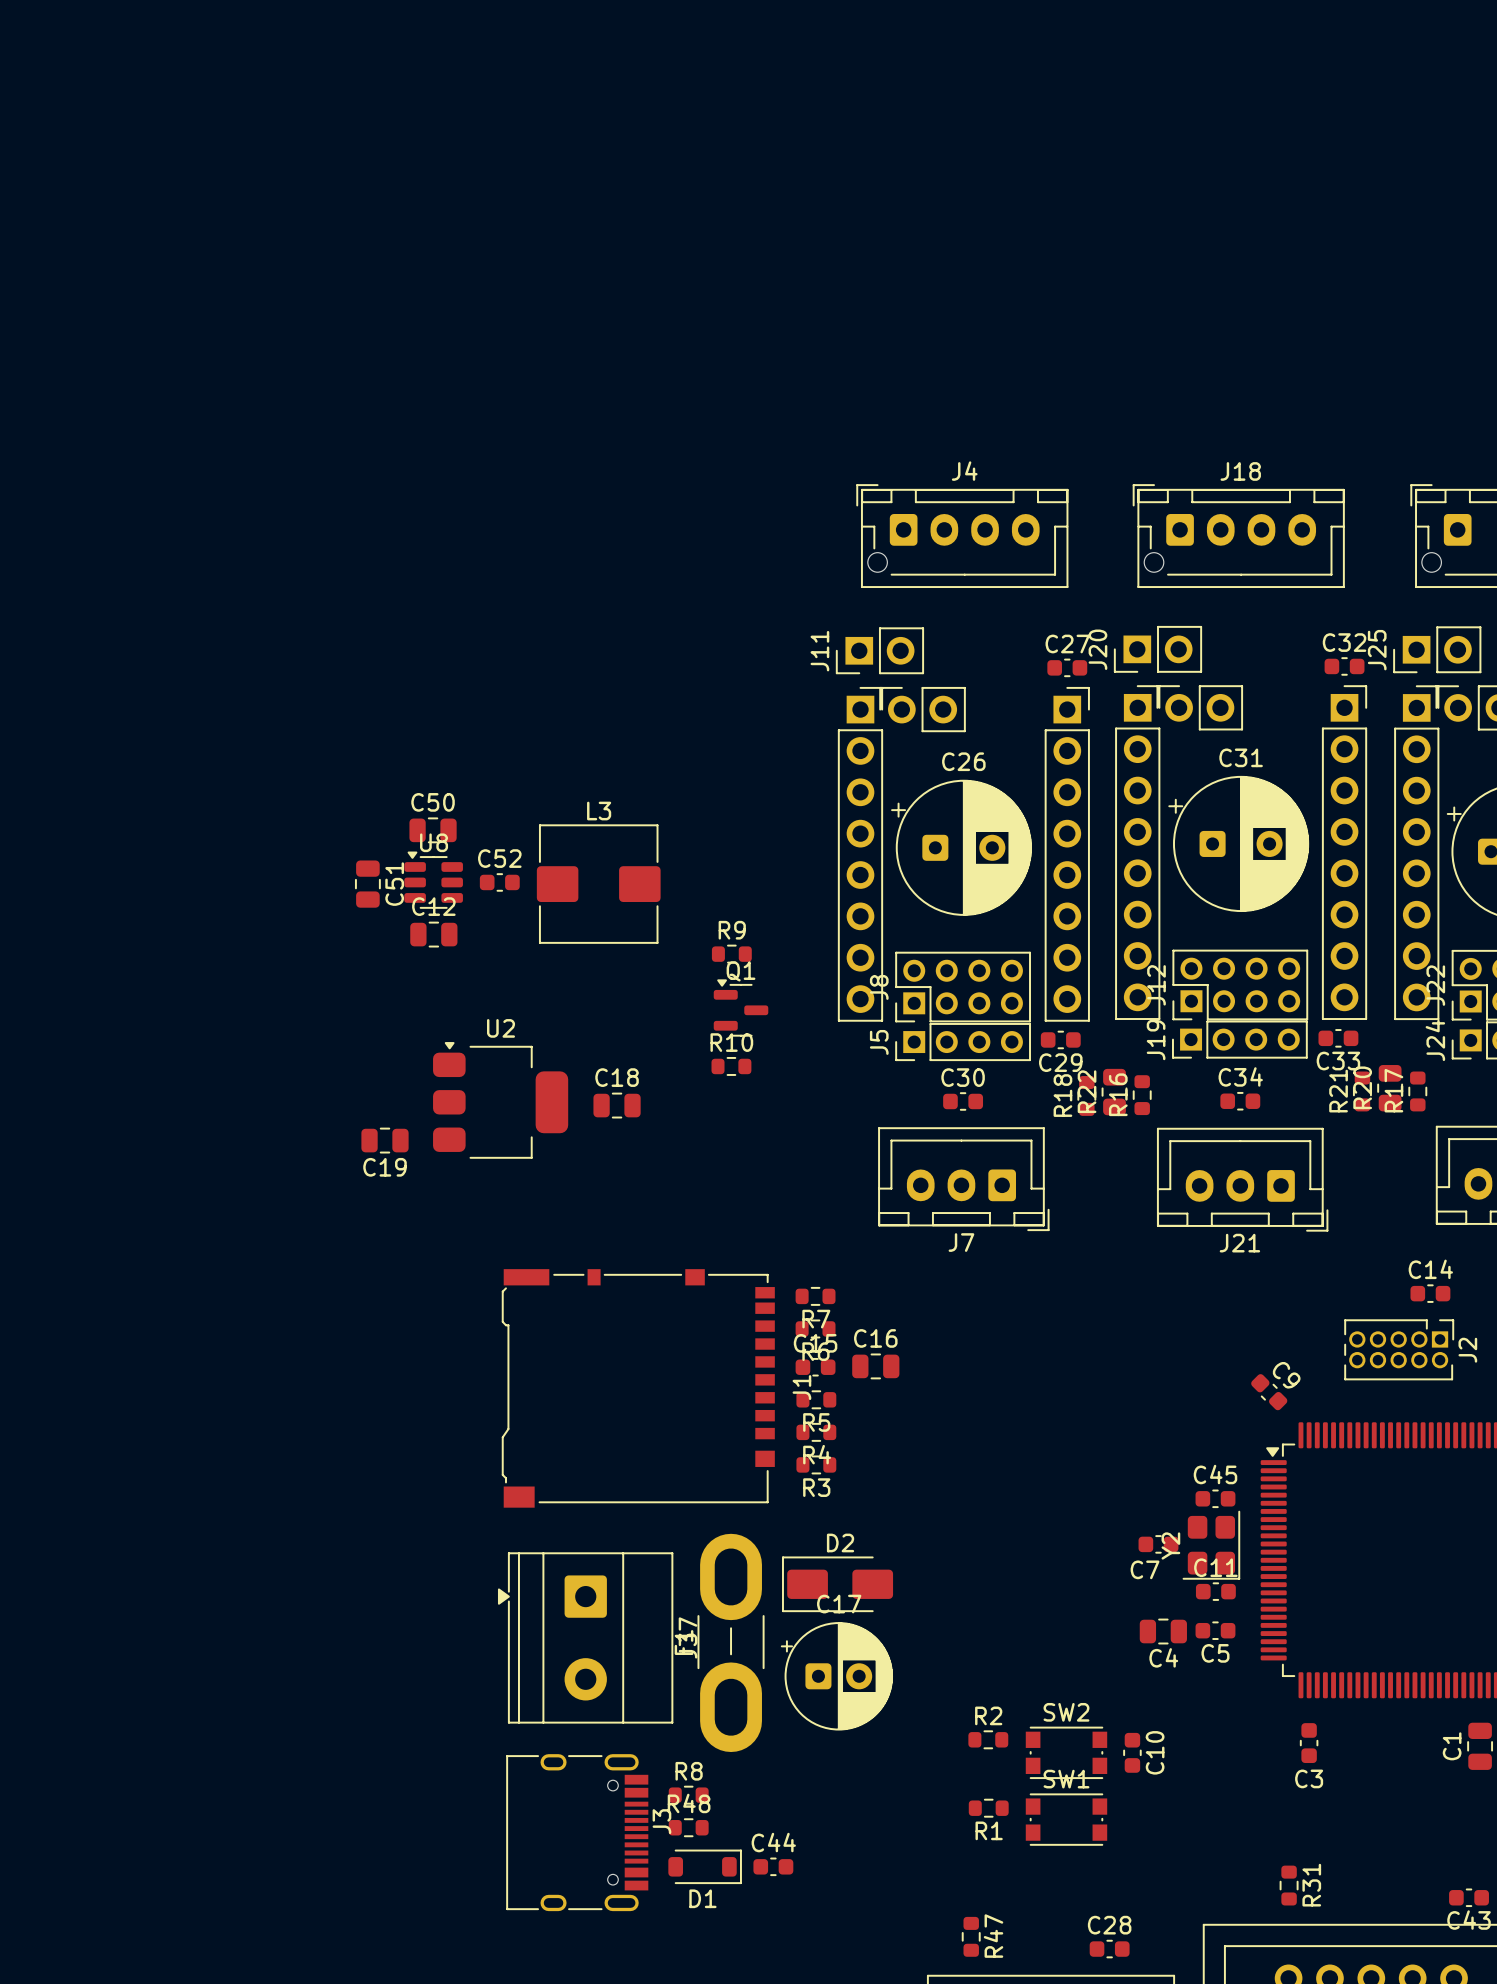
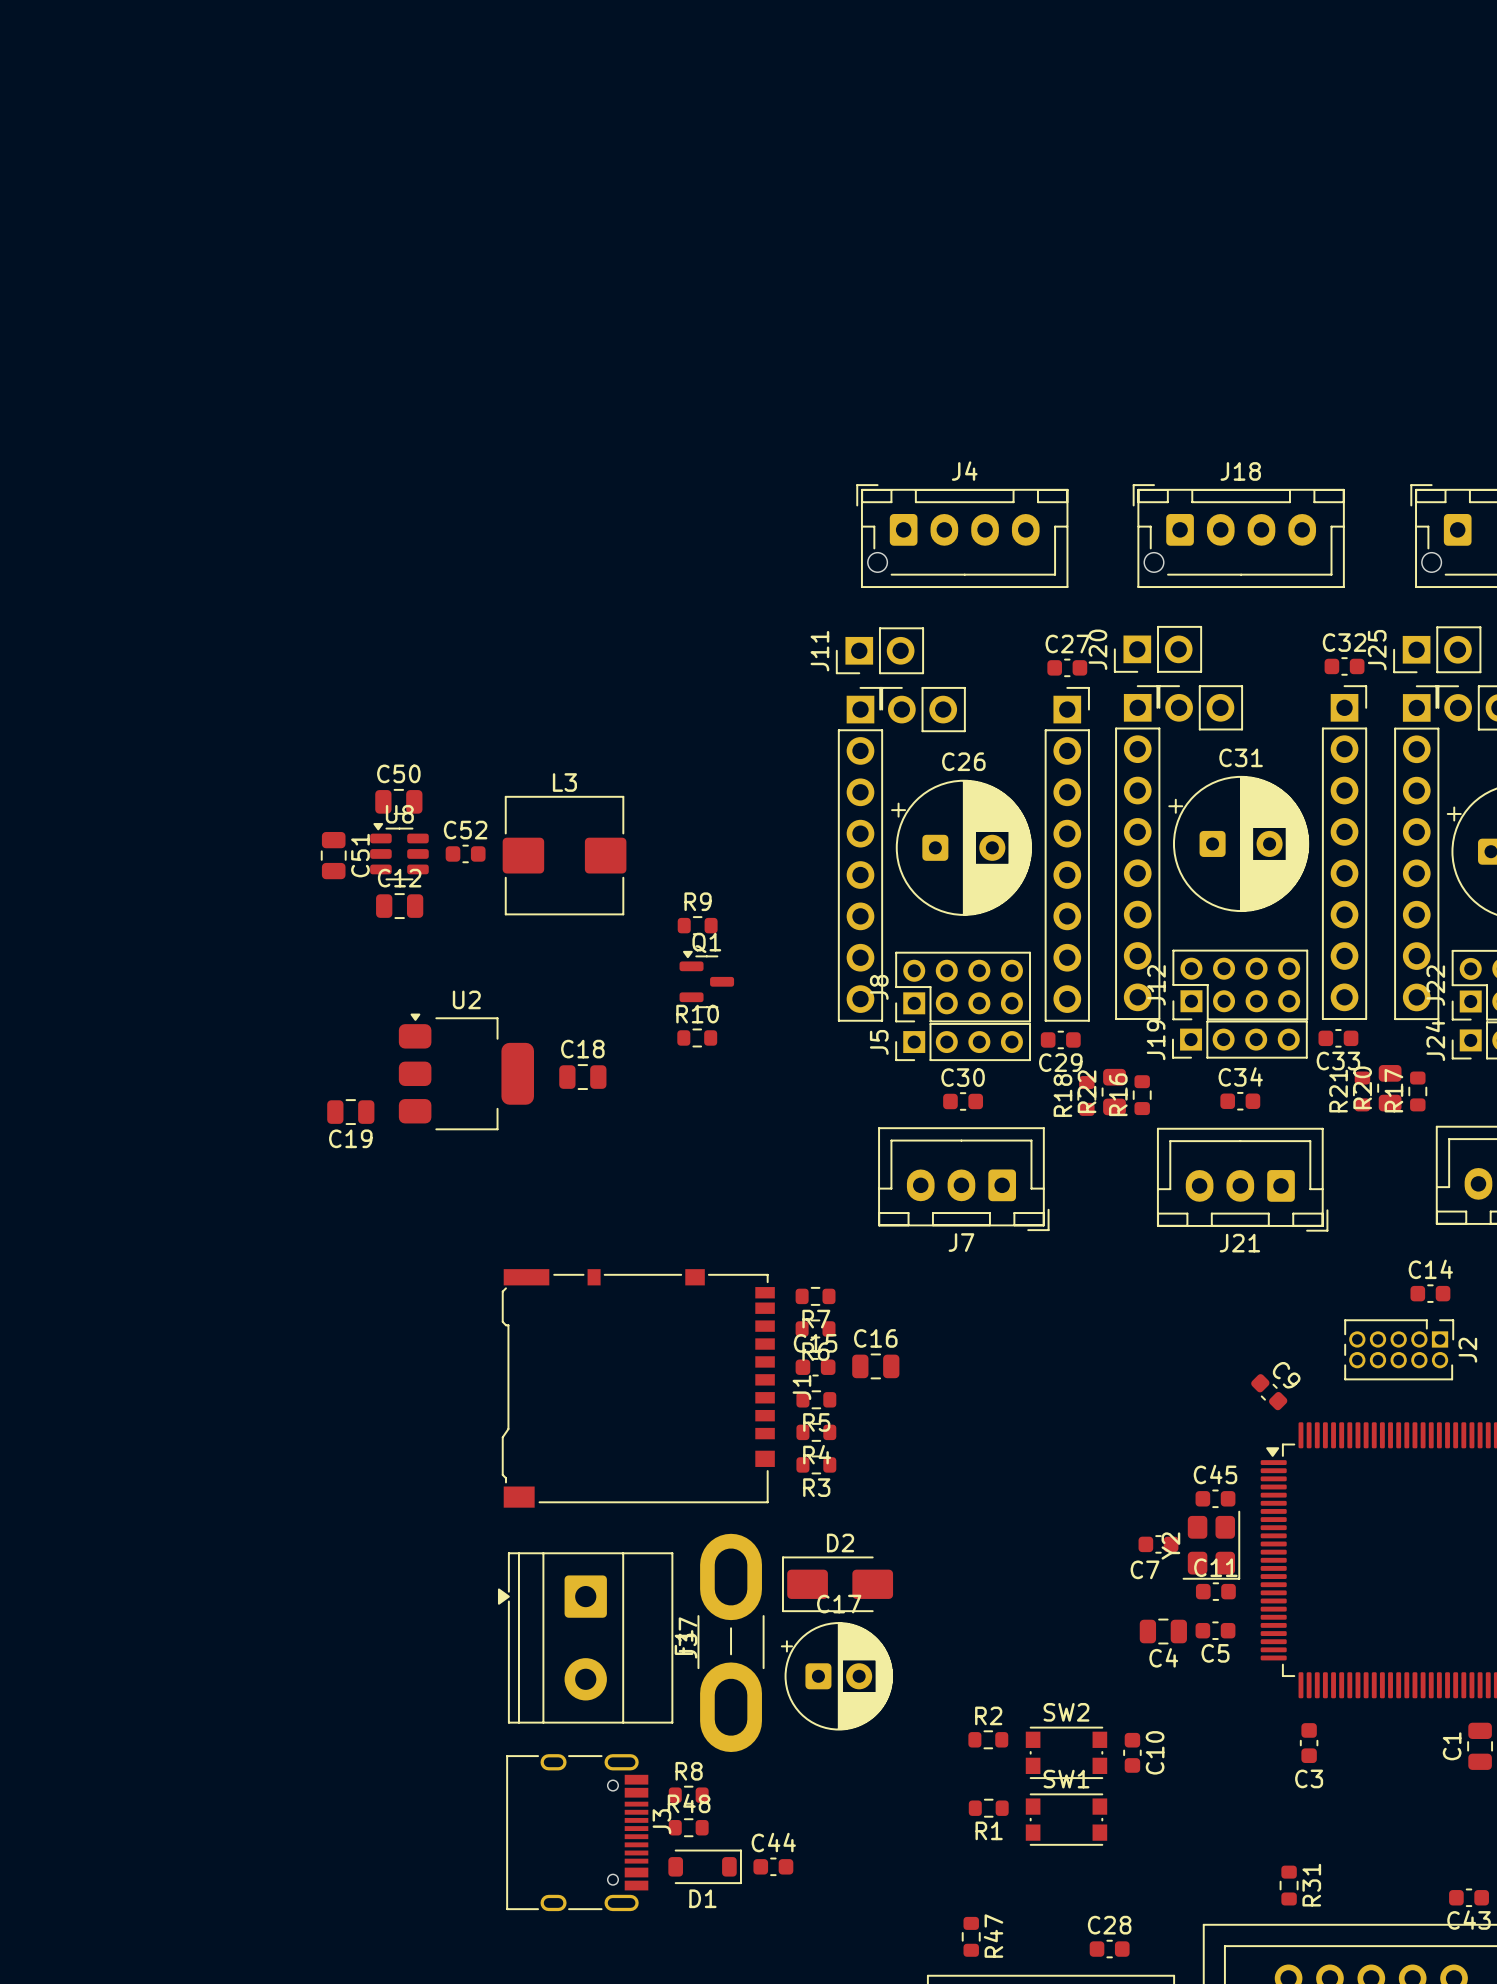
C50 position: (433, 830) -> (398, 801)
U8 position: (433, 880) -> (399, 851)
C52 position: (499, 882) -> (465, 853)
C51 position: (367, 884) -> (333, 855)
L3 position: (598, 884) -> (564, 855)
C12 position: (433, 934) -> (399, 906)
R9 position: (731, 954) -> (697, 925)
Q1 position: (741, 1008) -> (706, 979)
R10 position: (731, 1066) -> (697, 1037)
U2 position: (500, 1100) -> (466, 1071)
C18 position: (617, 1105) -> (582, 1077)
C19 position: (385, 1140) -> (350, 1112)

